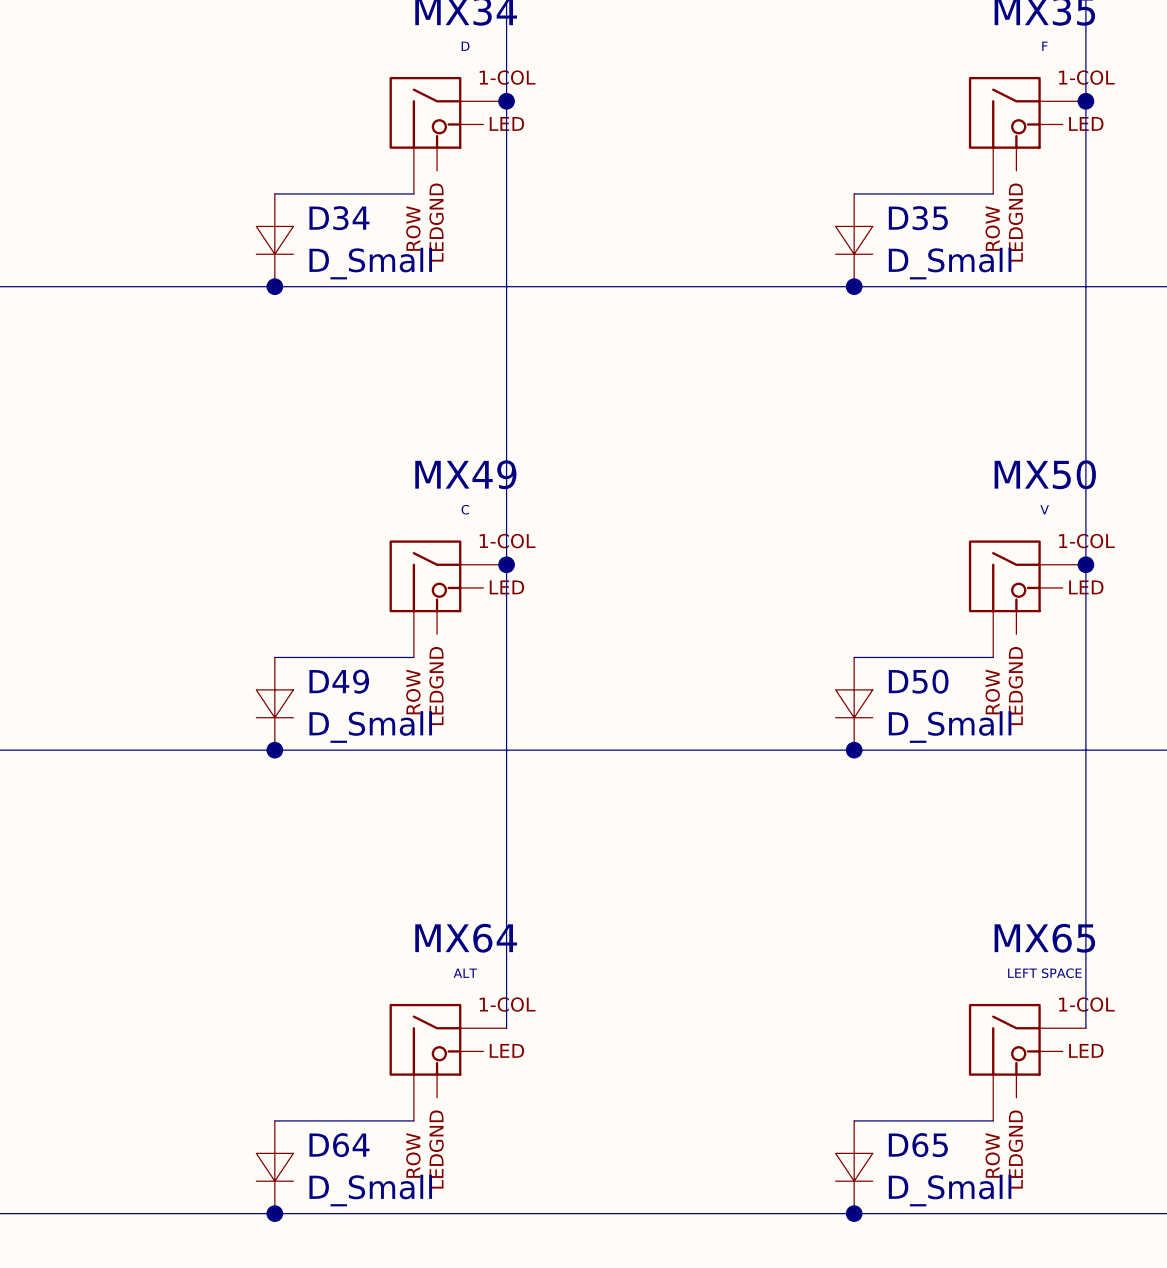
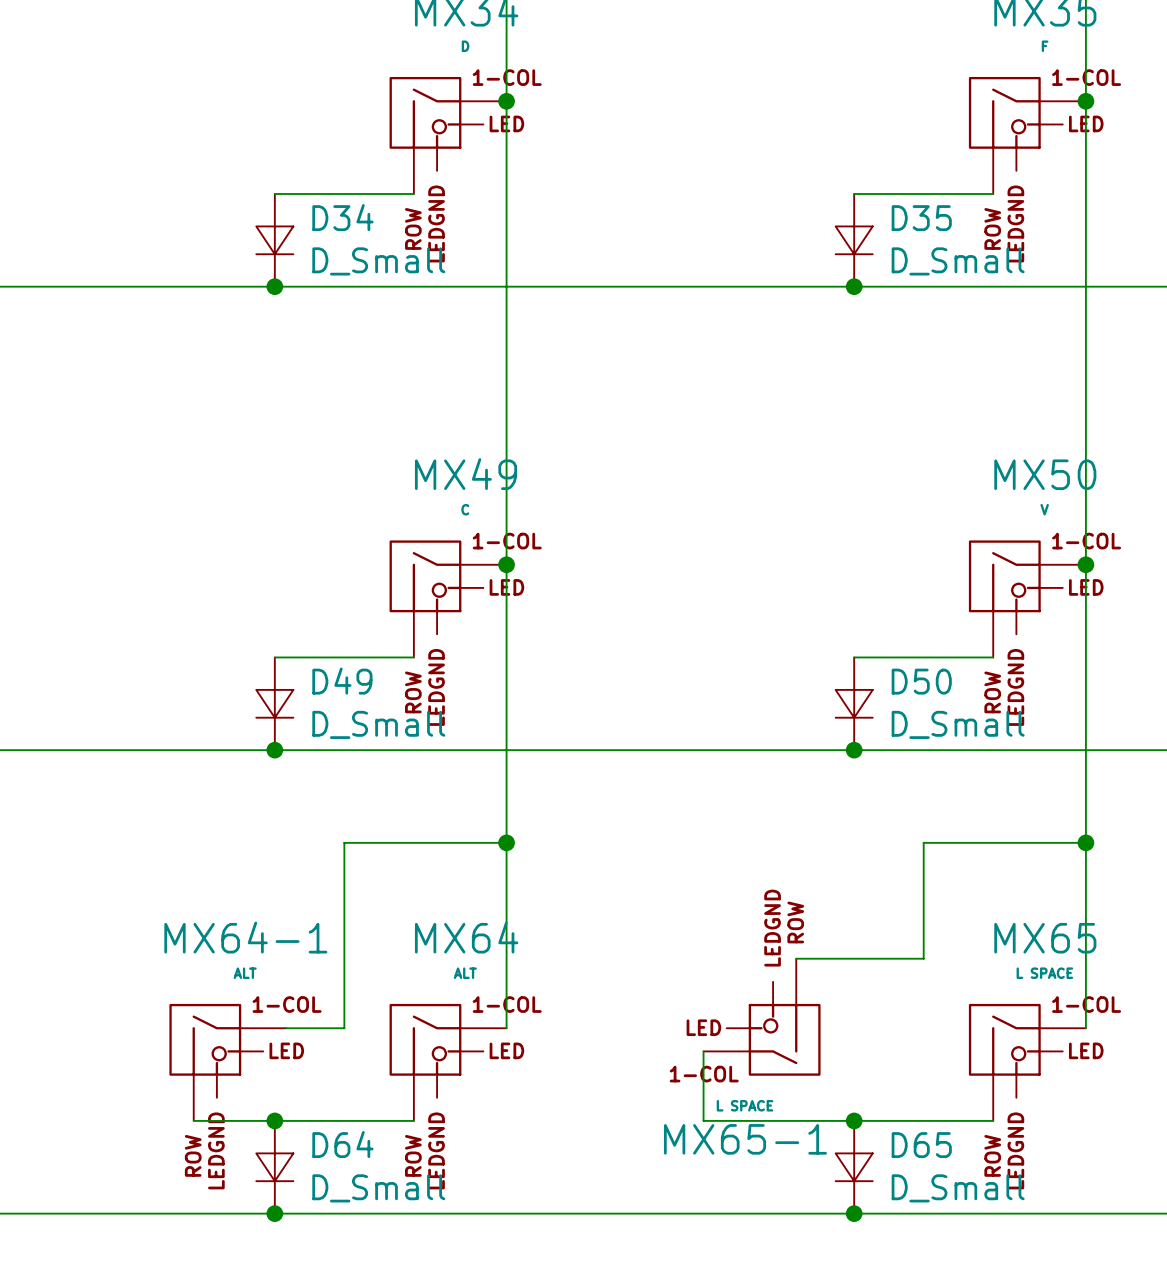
wire: none -> (506, 842) (344, 842) (344, 1028) (286, 1028)
junction: none -> (506, 842)
wire: none -> (1085, 842) (923, 842) (923, 958) (796, 958)
junction: none -> (1085, 842)
MX65 value: LEFT SPACE (1044, 973) -> L SPACE (1044, 973)
MX65-1: none -> L SPACE (762, 1017)
wire: none -> (703, 1051) (703, 1120) (854, 1120)
MX64-1: none -> ALT (227, 1062)
wire: none -> (193, 1120) (274, 1120)
junction: none -> (274, 1120)
junction: none -> (854, 1120)

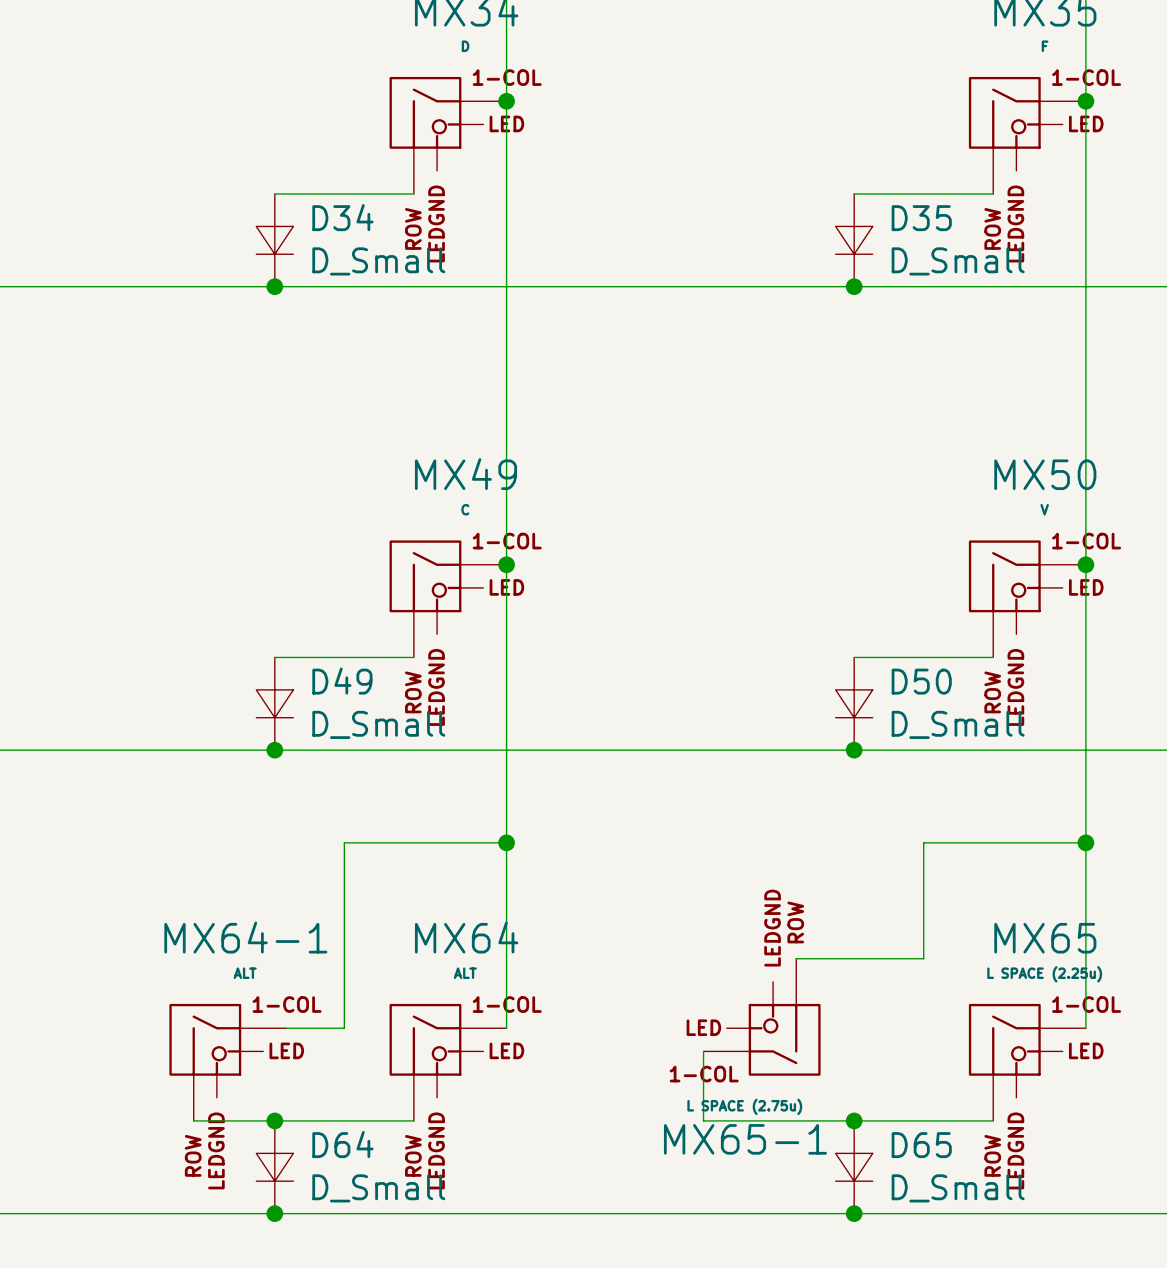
MX65 value: L SPACE (1044, 973) -> L SPACE (2.25u) (1044, 974)
MX65-1 value: L SPACE (745, 1105) -> L SPACE (2.75u) (744, 1106)

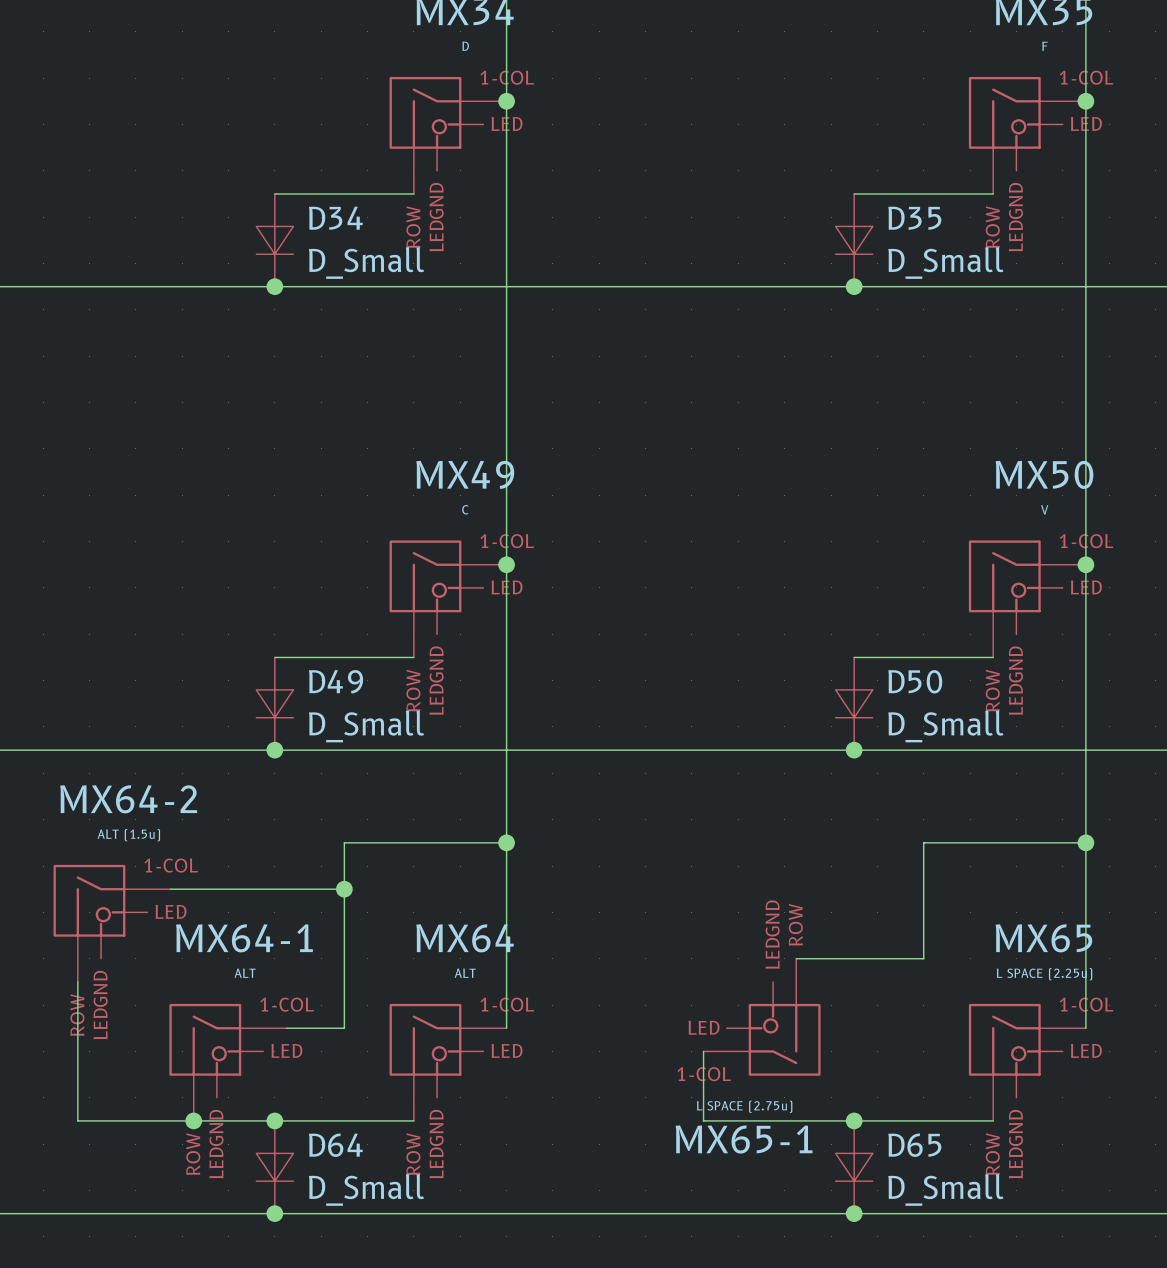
wire: none -> (170, 889) (344, 889)
junction: none -> (344, 889)
MX64-2: none -> ALT (1.5u) (112, 923)
wire: none -> (77, 981) (77, 1120) (193, 1120)
junction: none -> (193, 1120)

